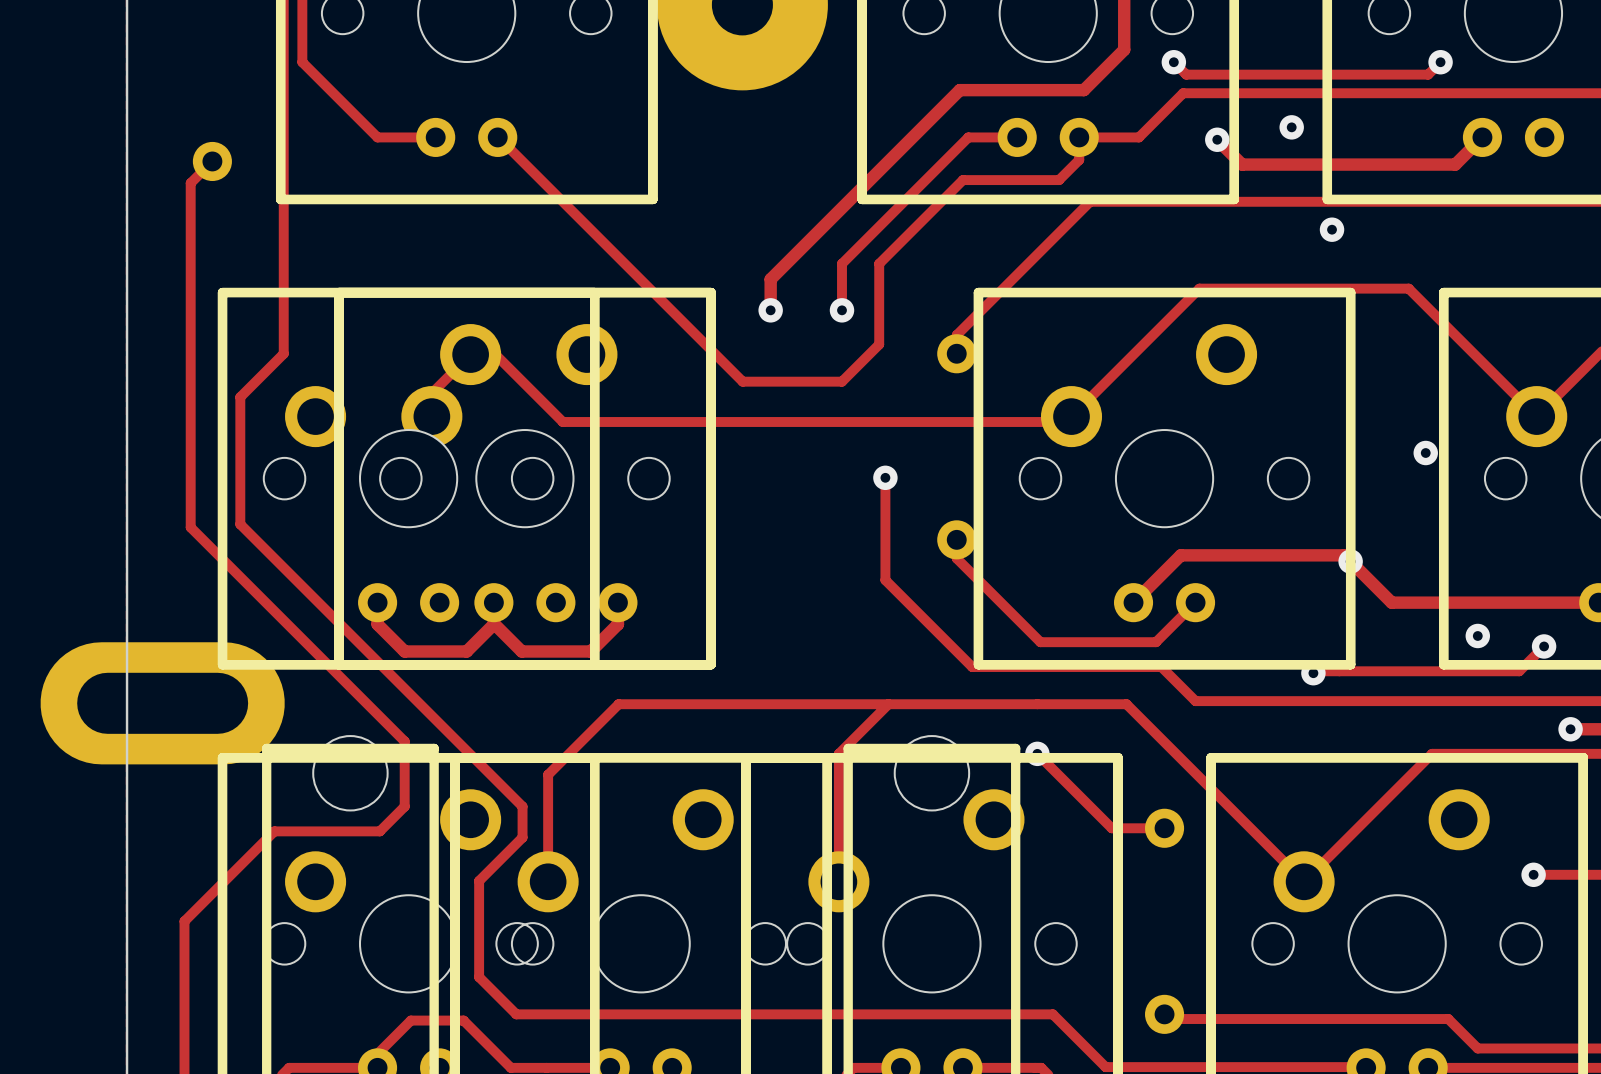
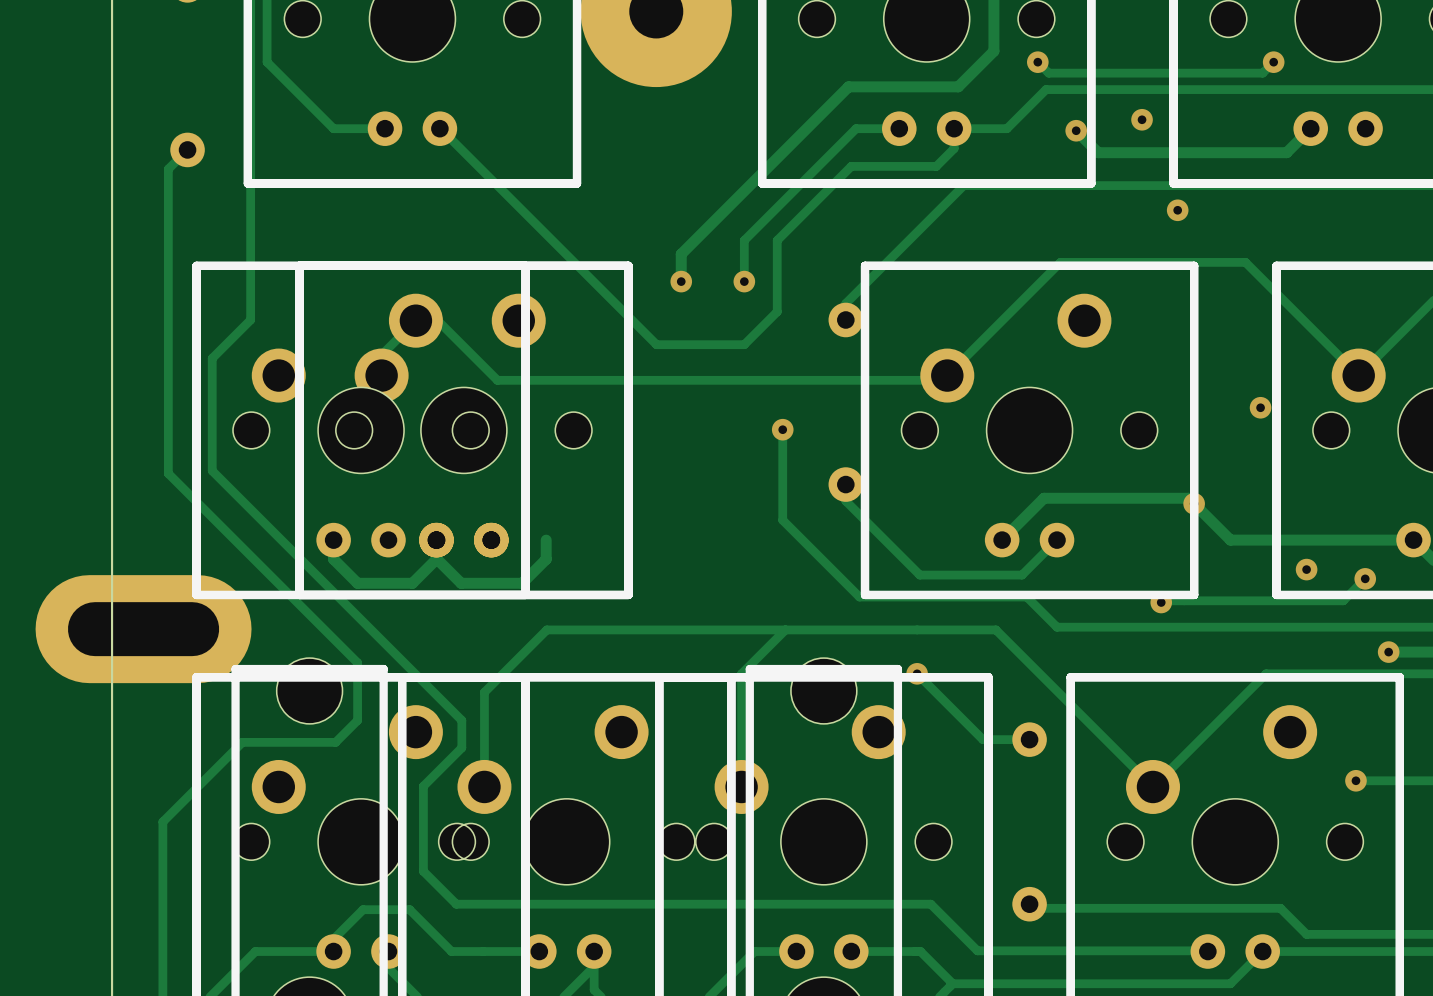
part footprint: [334, 287, 716, 670] -> [295, 261, 633, 600]

